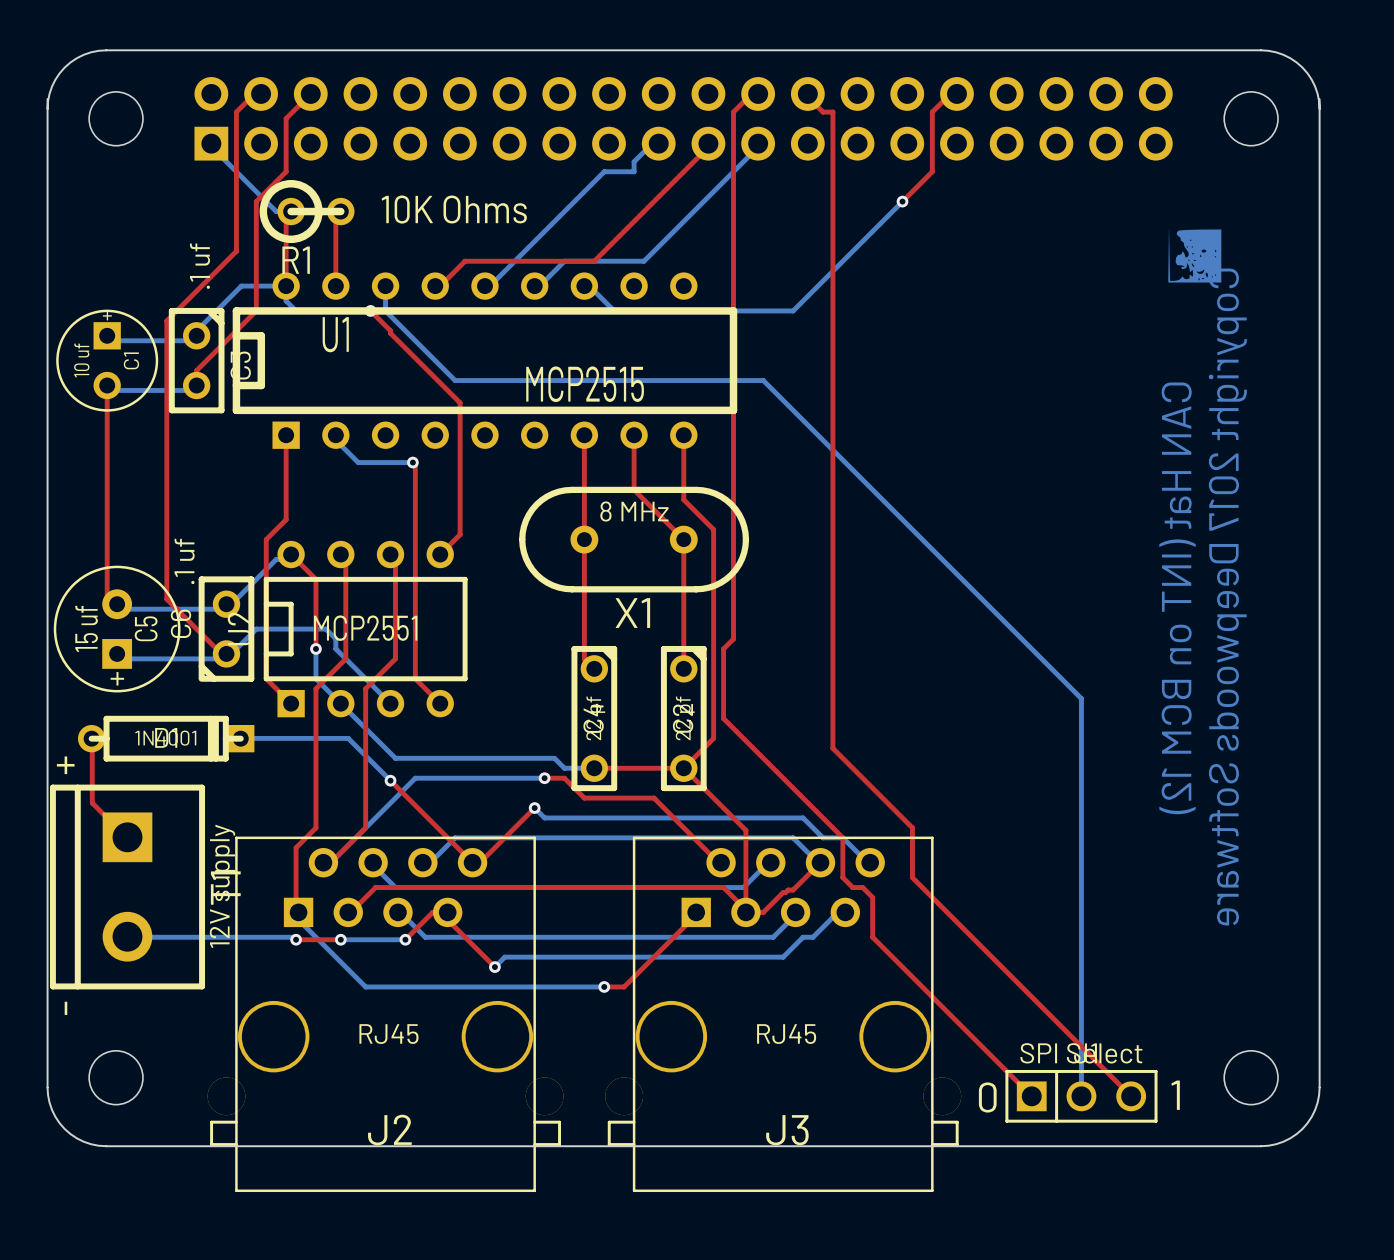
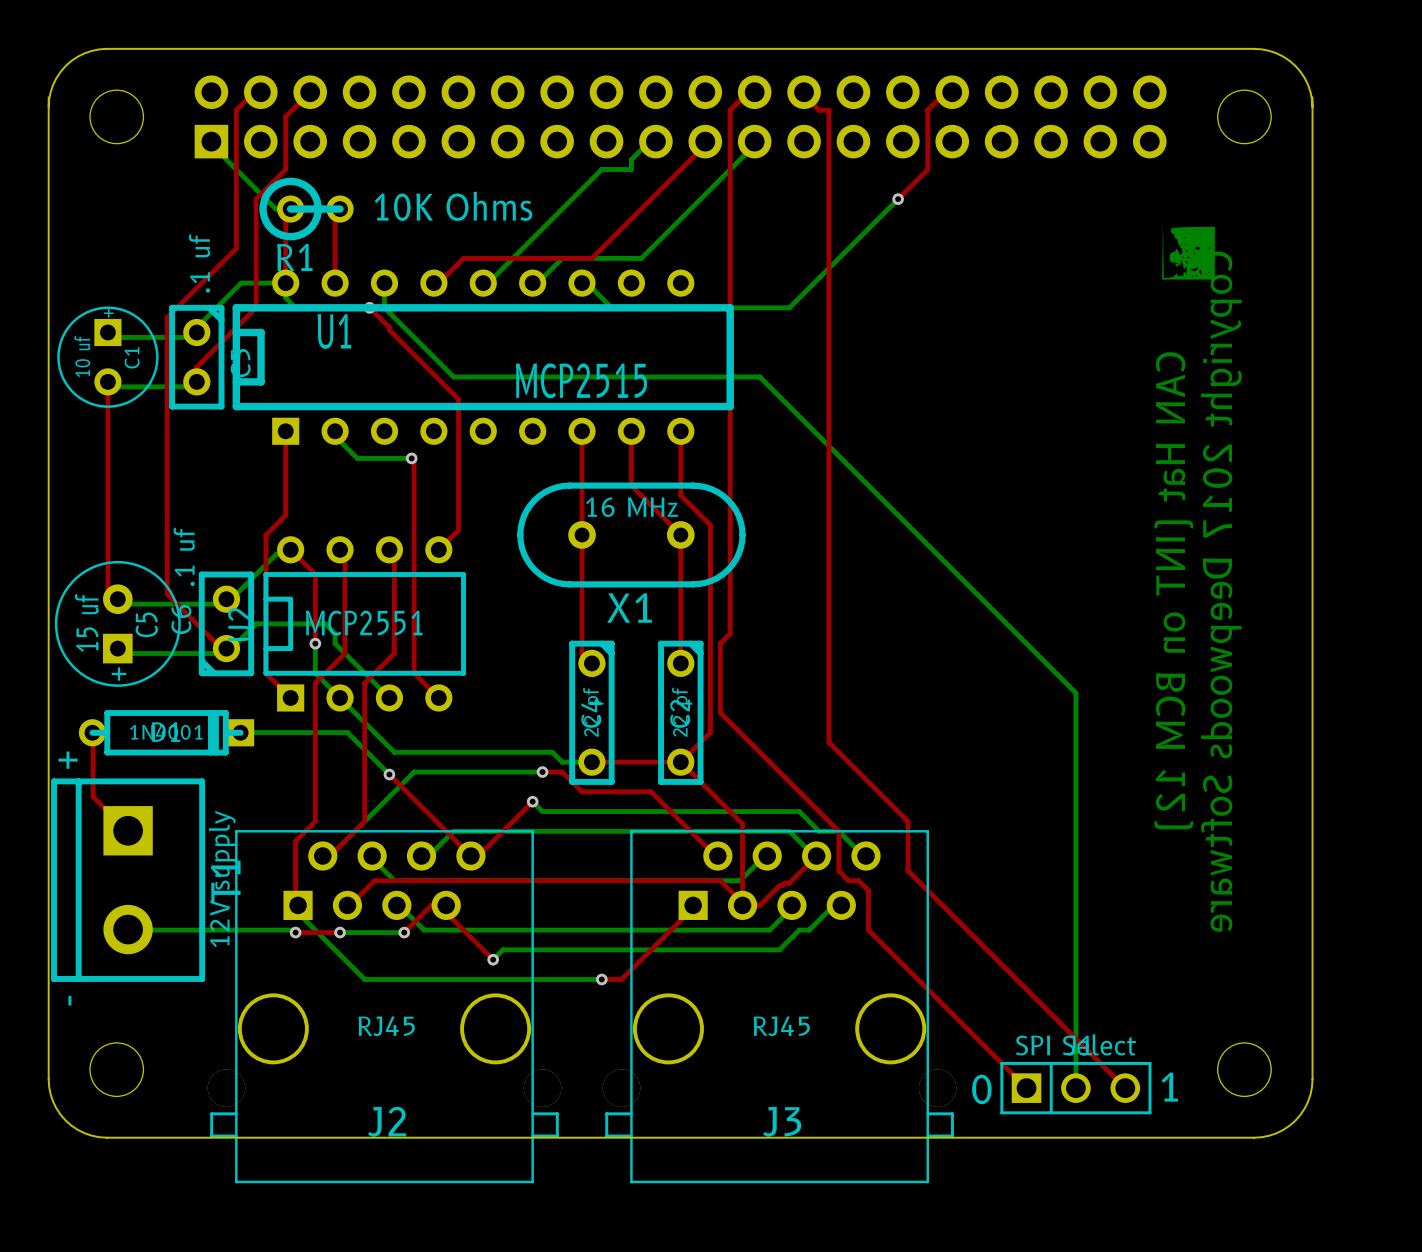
X1 value: 8 MHz (634, 511) -> 16 MHz (632, 507)

